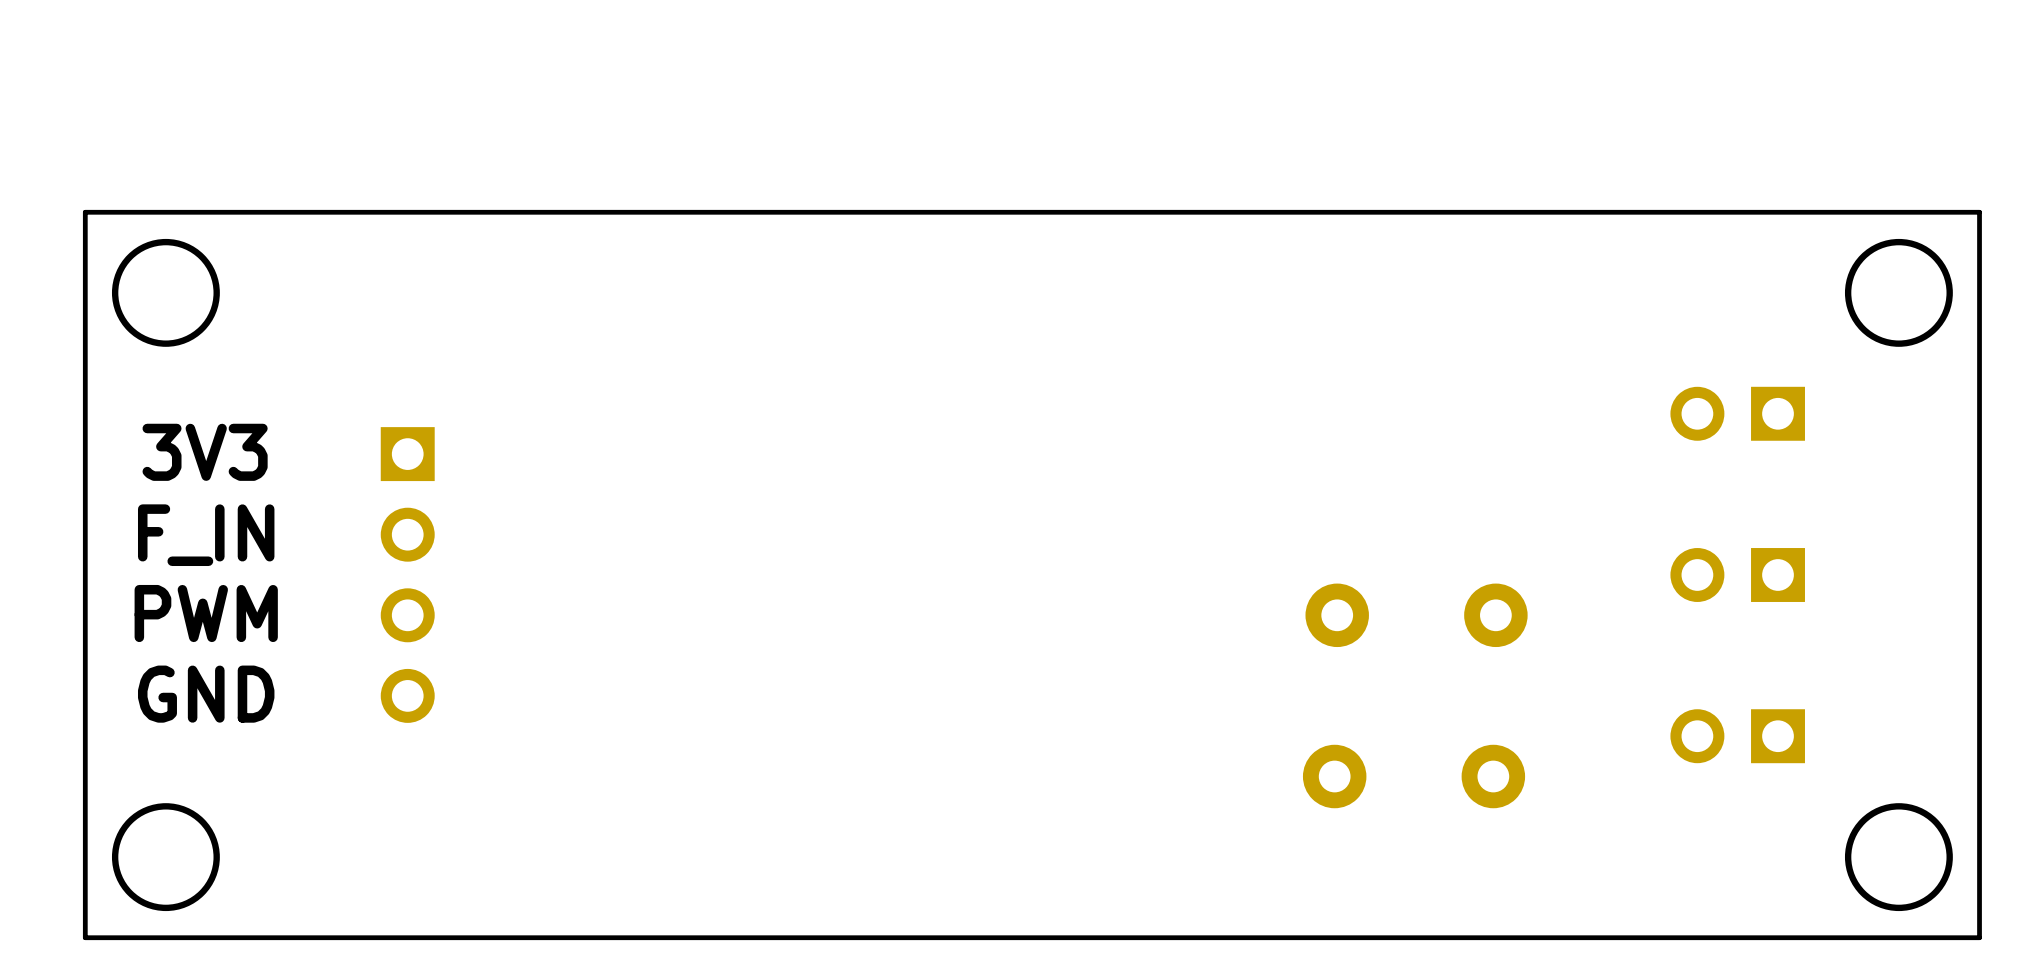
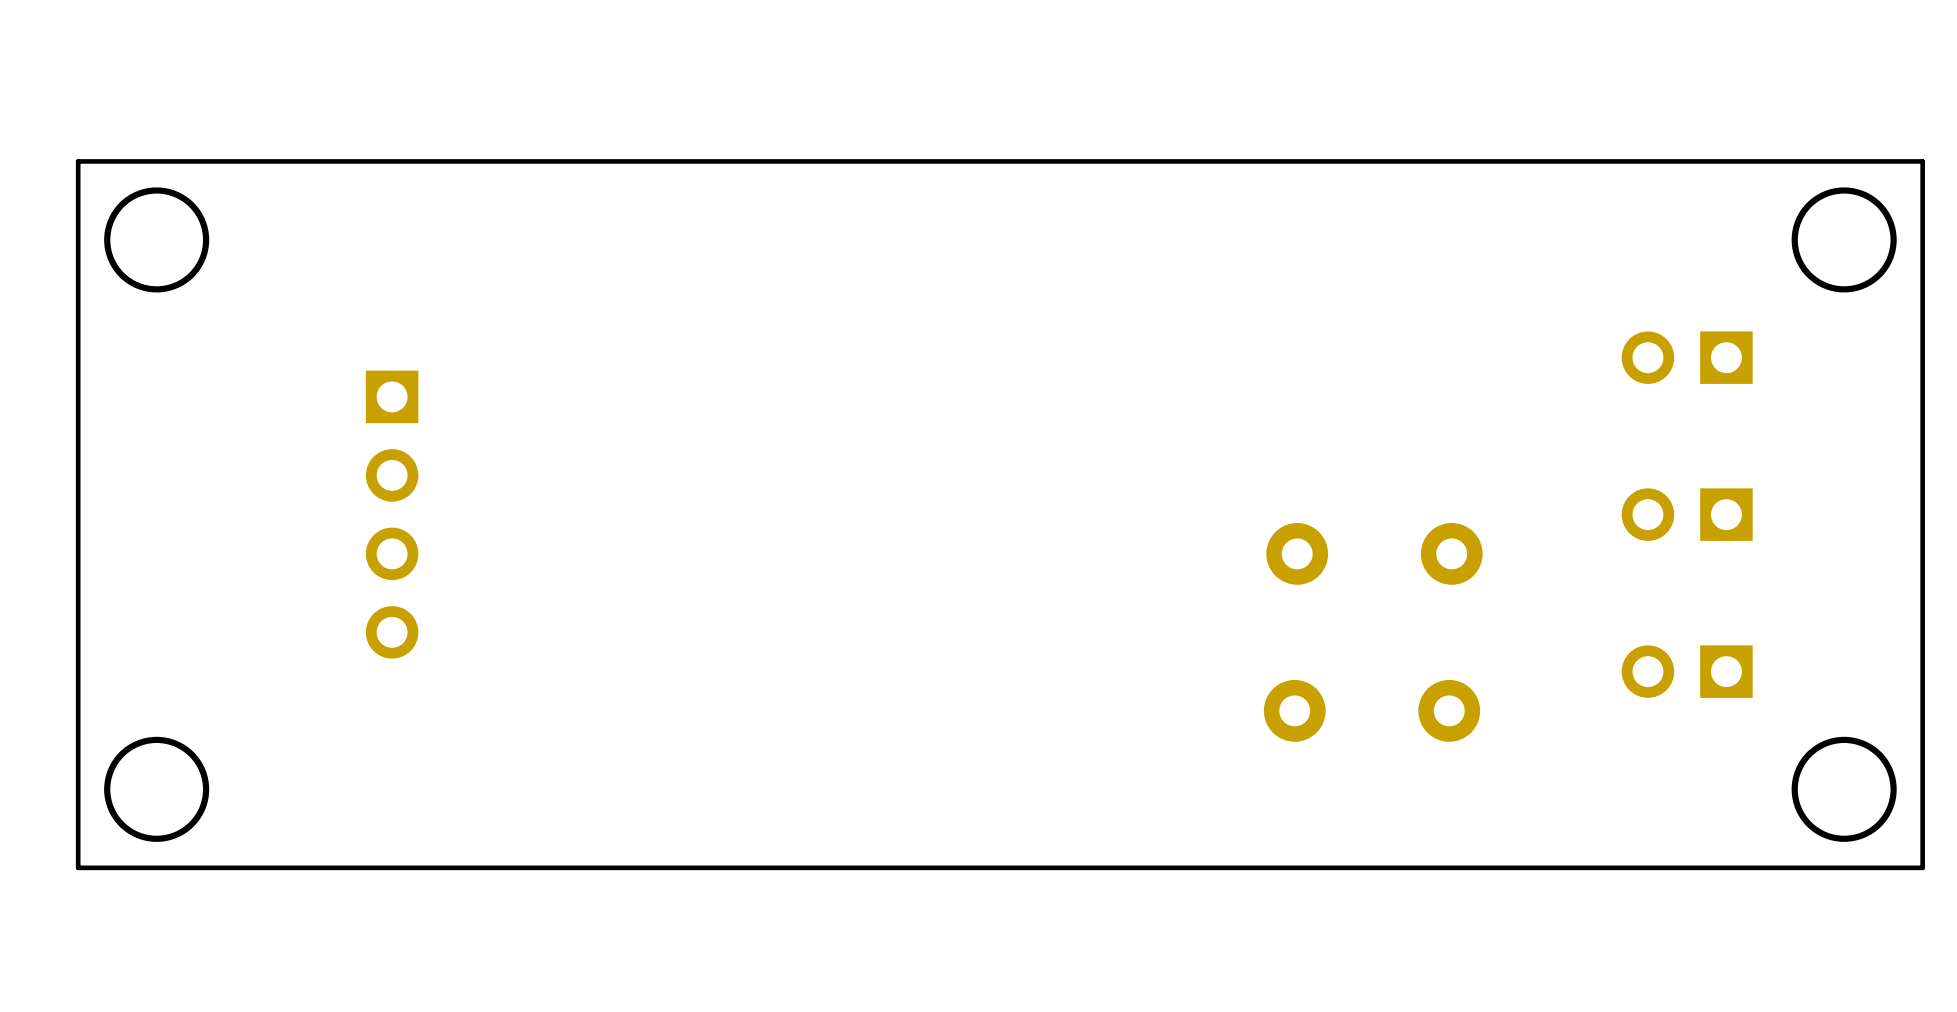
text: 3V3 (205, 452) -> none
text: F_IN (206, 535) -> none
text: PWM (206, 613) -> none
text: GND (206, 694) -> none

